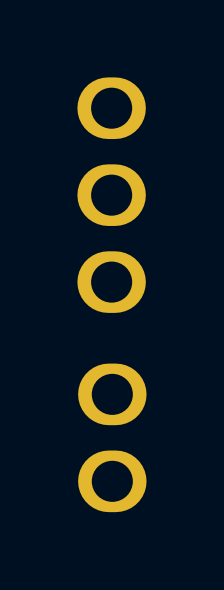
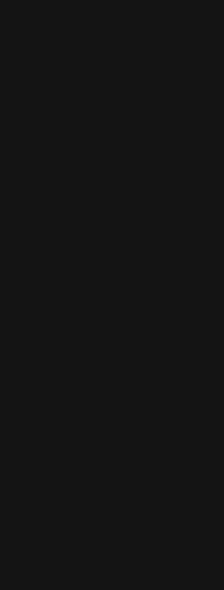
part: (111, 195) -> none
part: (112, 437) -> none

